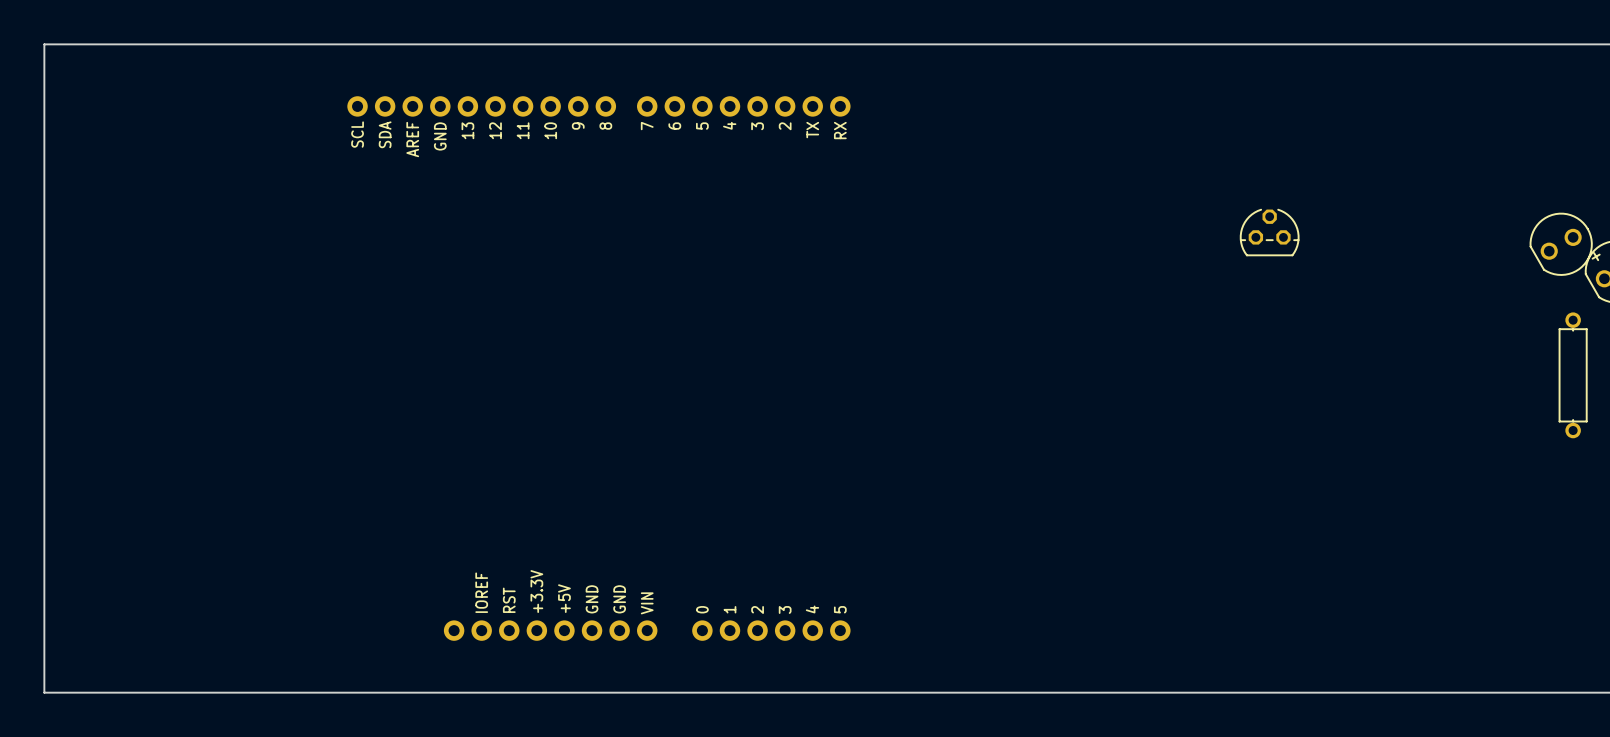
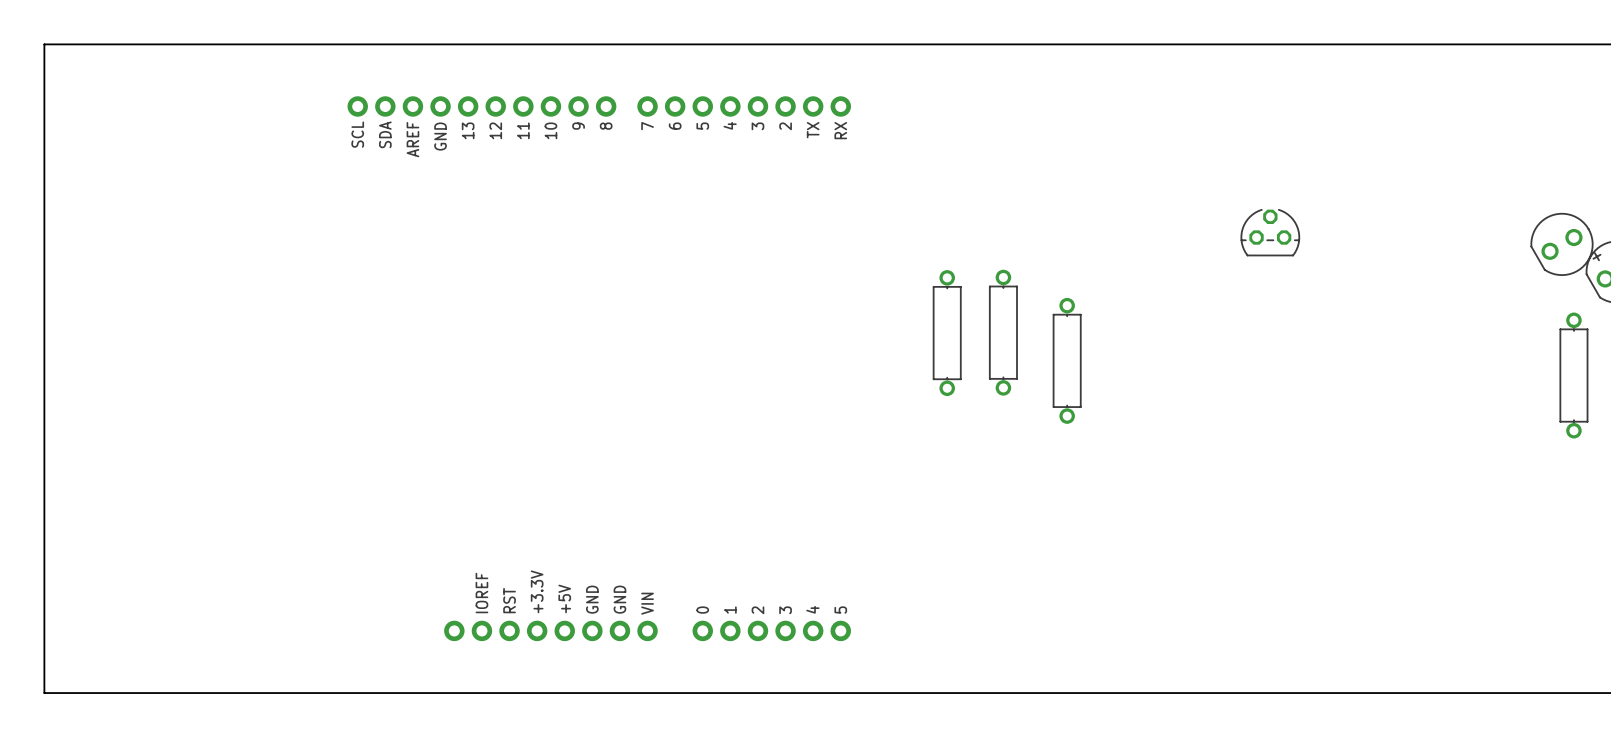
part: none -> (947, 333)
part: none -> (1003, 332)
part: none -> (1067, 360)

